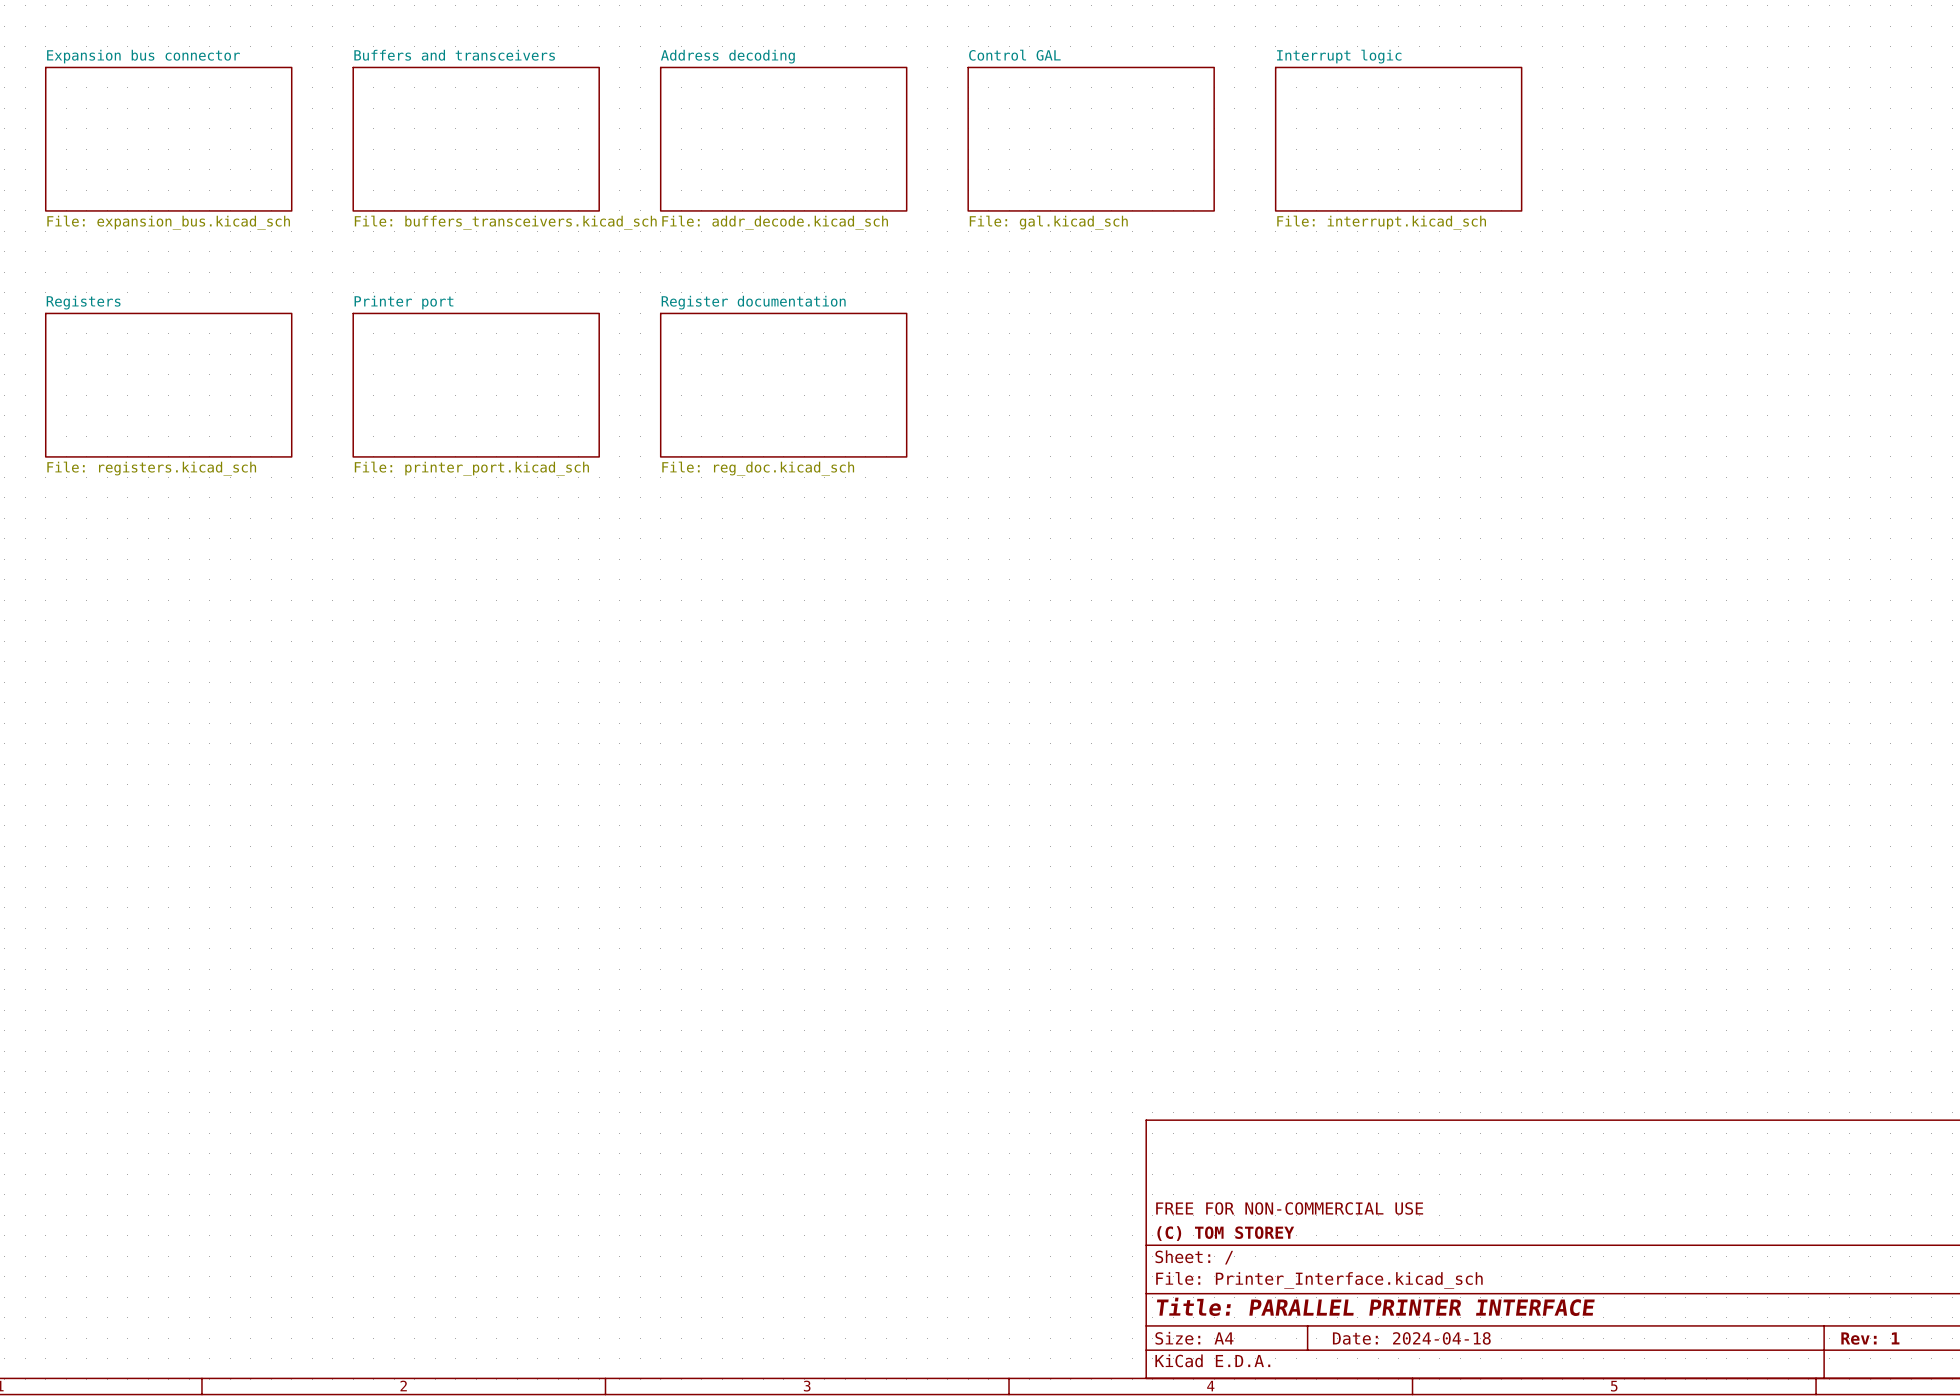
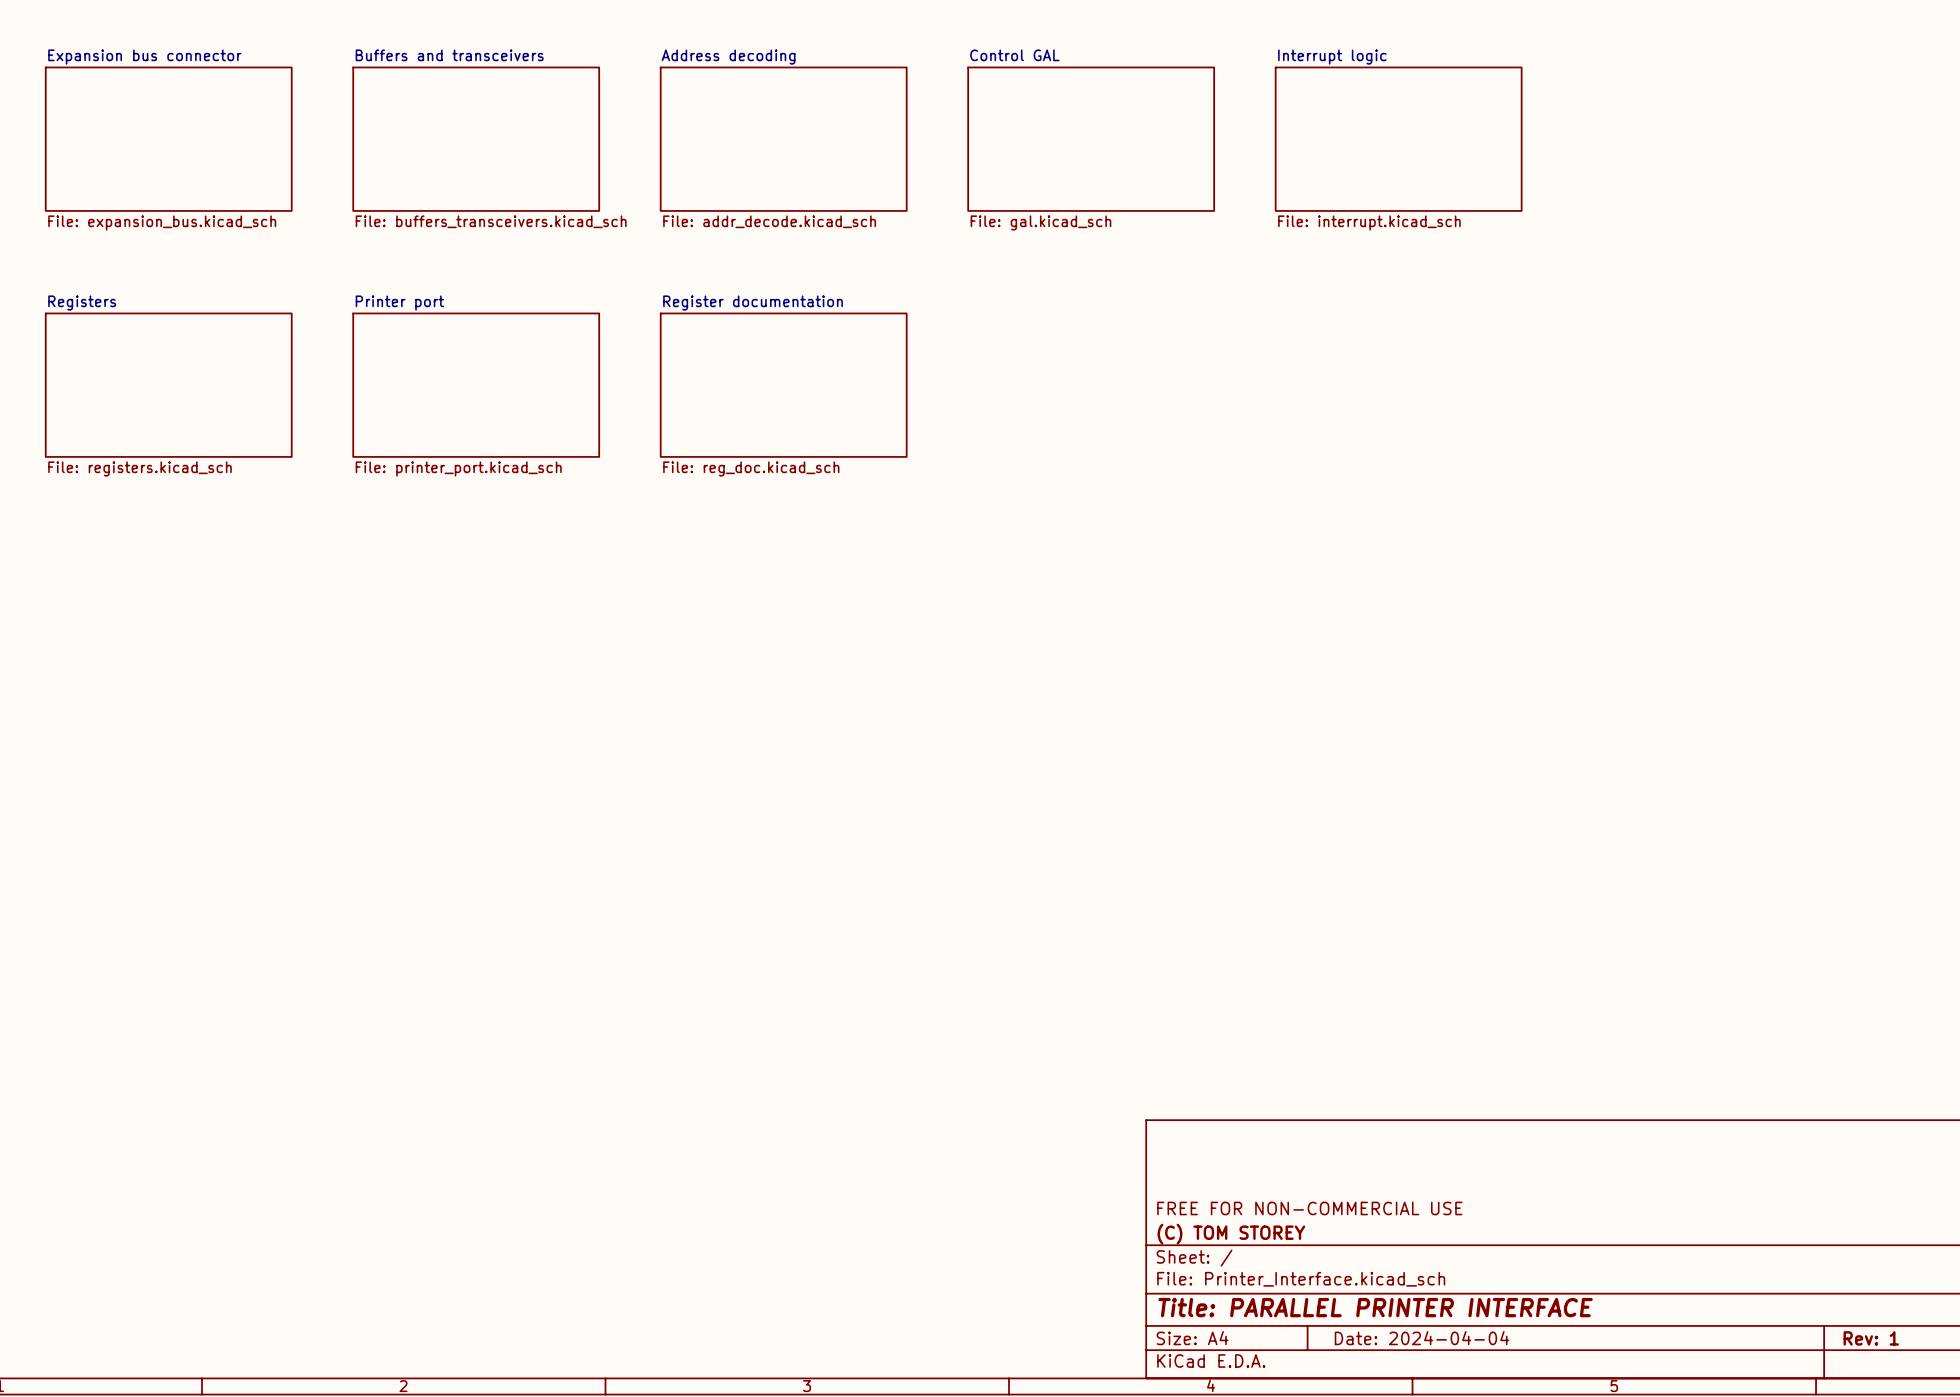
title block: Date: 2024-04-18 (1411, 1338) -> Date: 2024-04-04 (1421, 1338)

